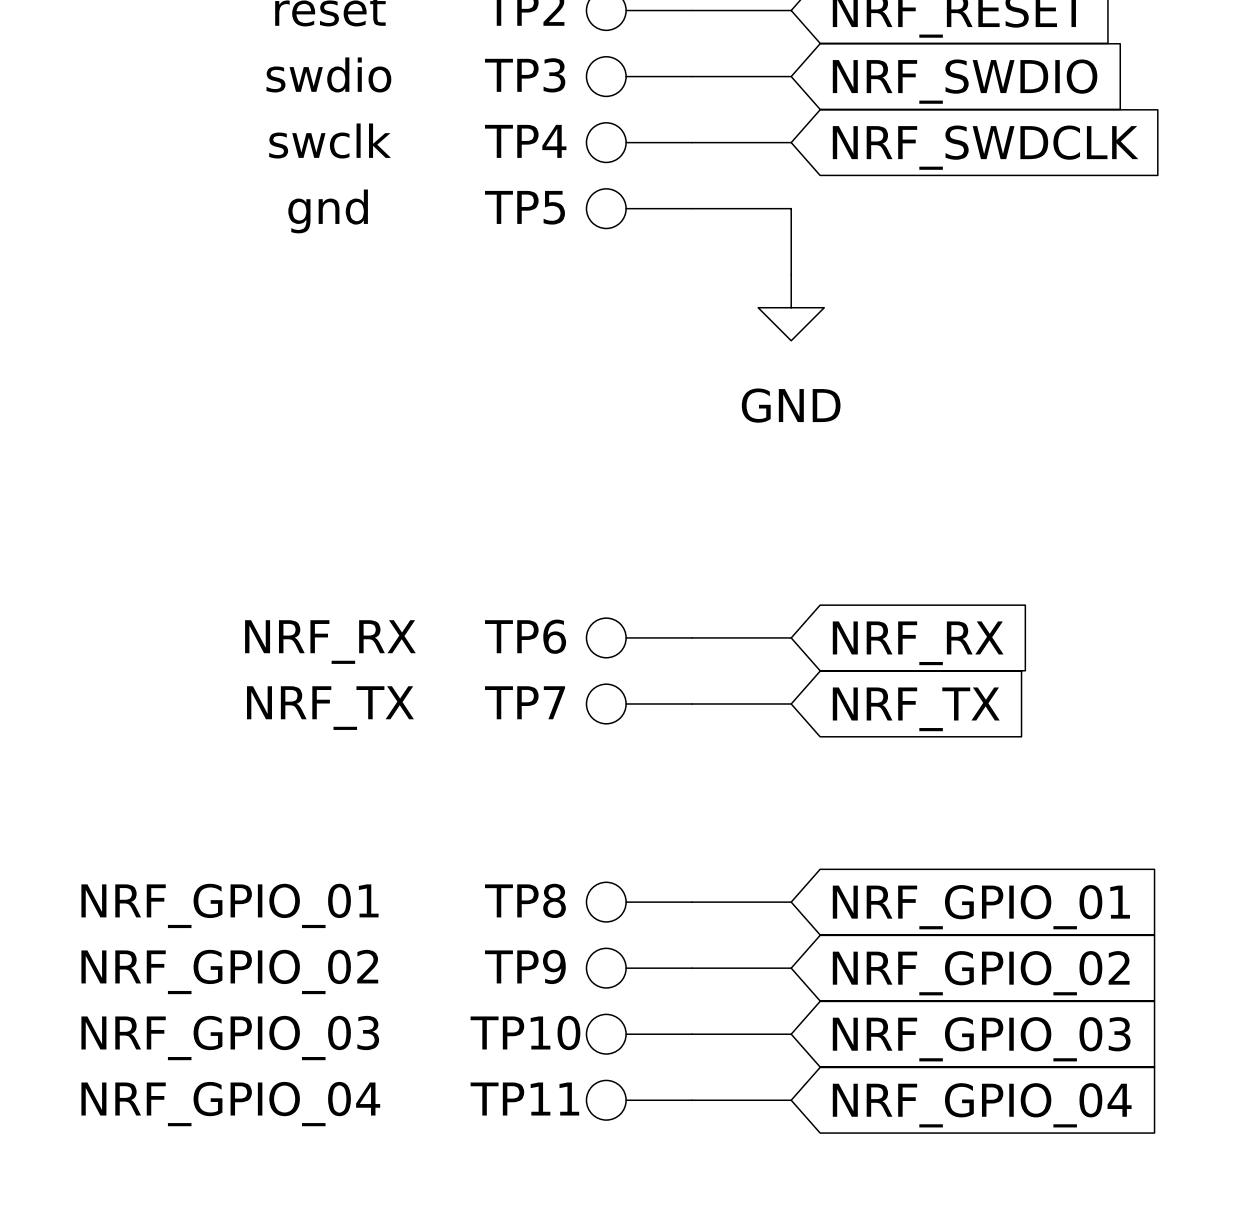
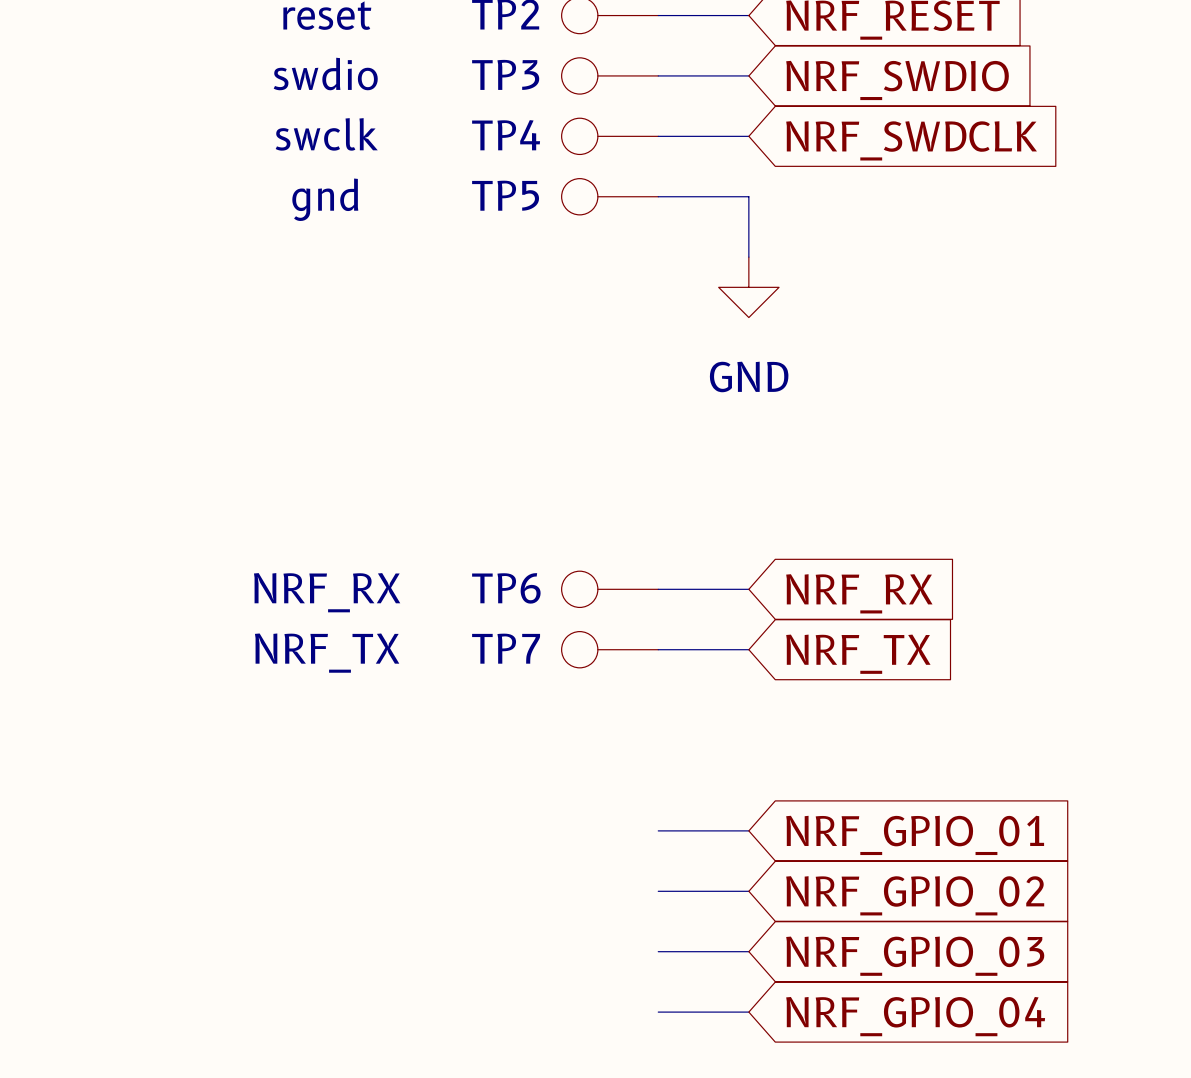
TP8: NRF_GPIO_01 (639, 902) -> none
TP9: NRF_GPIO_02 (639, 968) -> none
TP10: NRF_GPIO_03 (639, 1034) -> none
TP11: NRF_GPIO_04 (639, 1100) -> none

